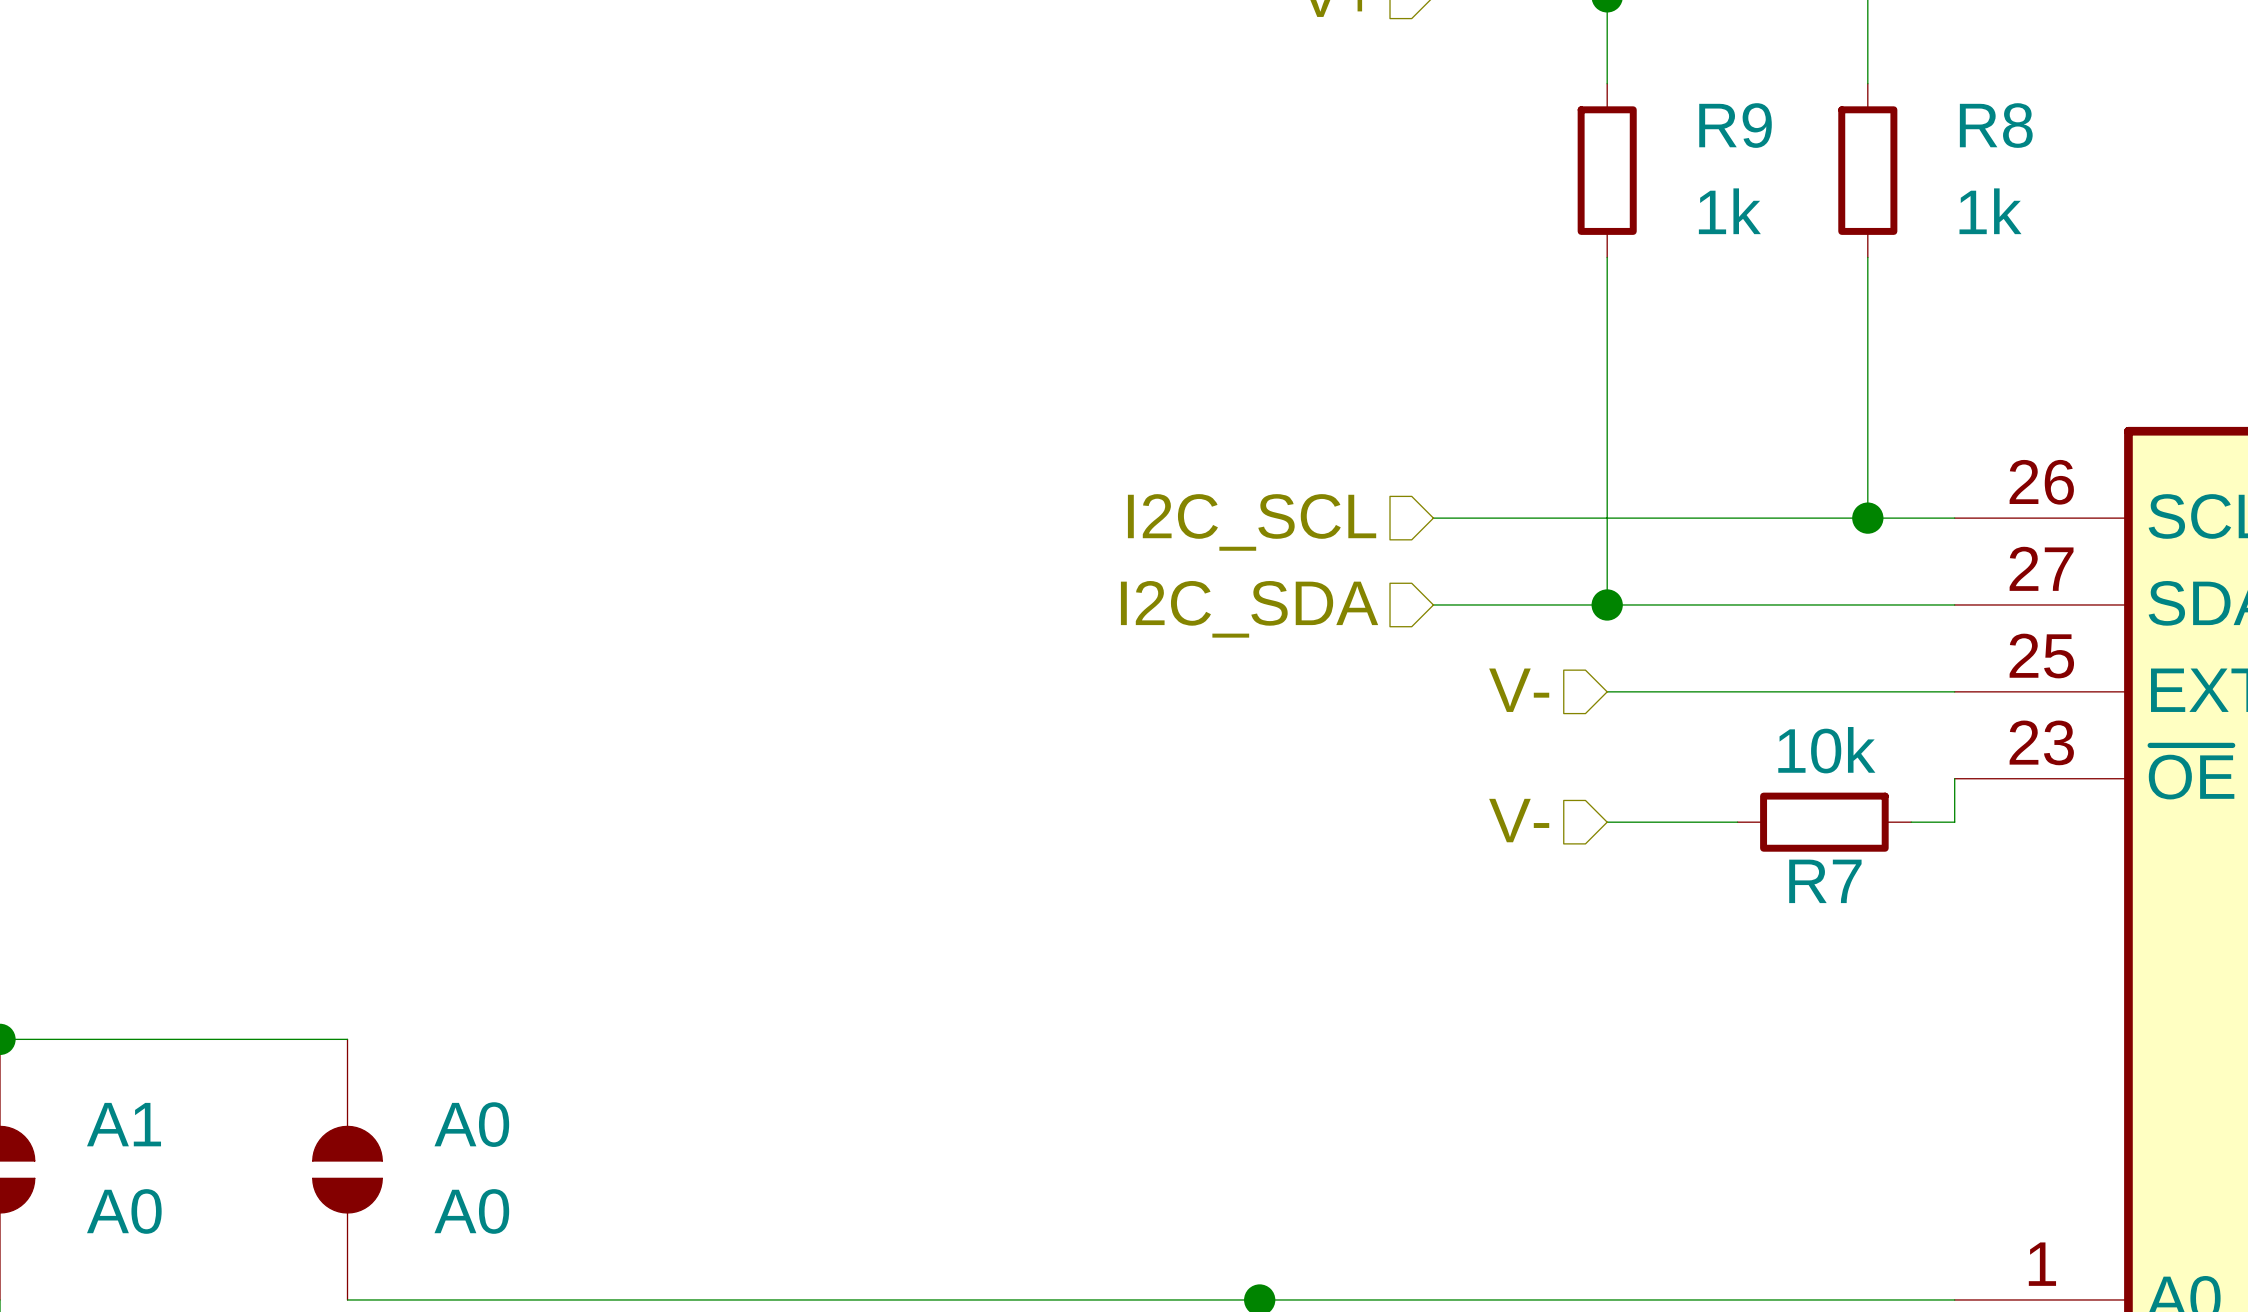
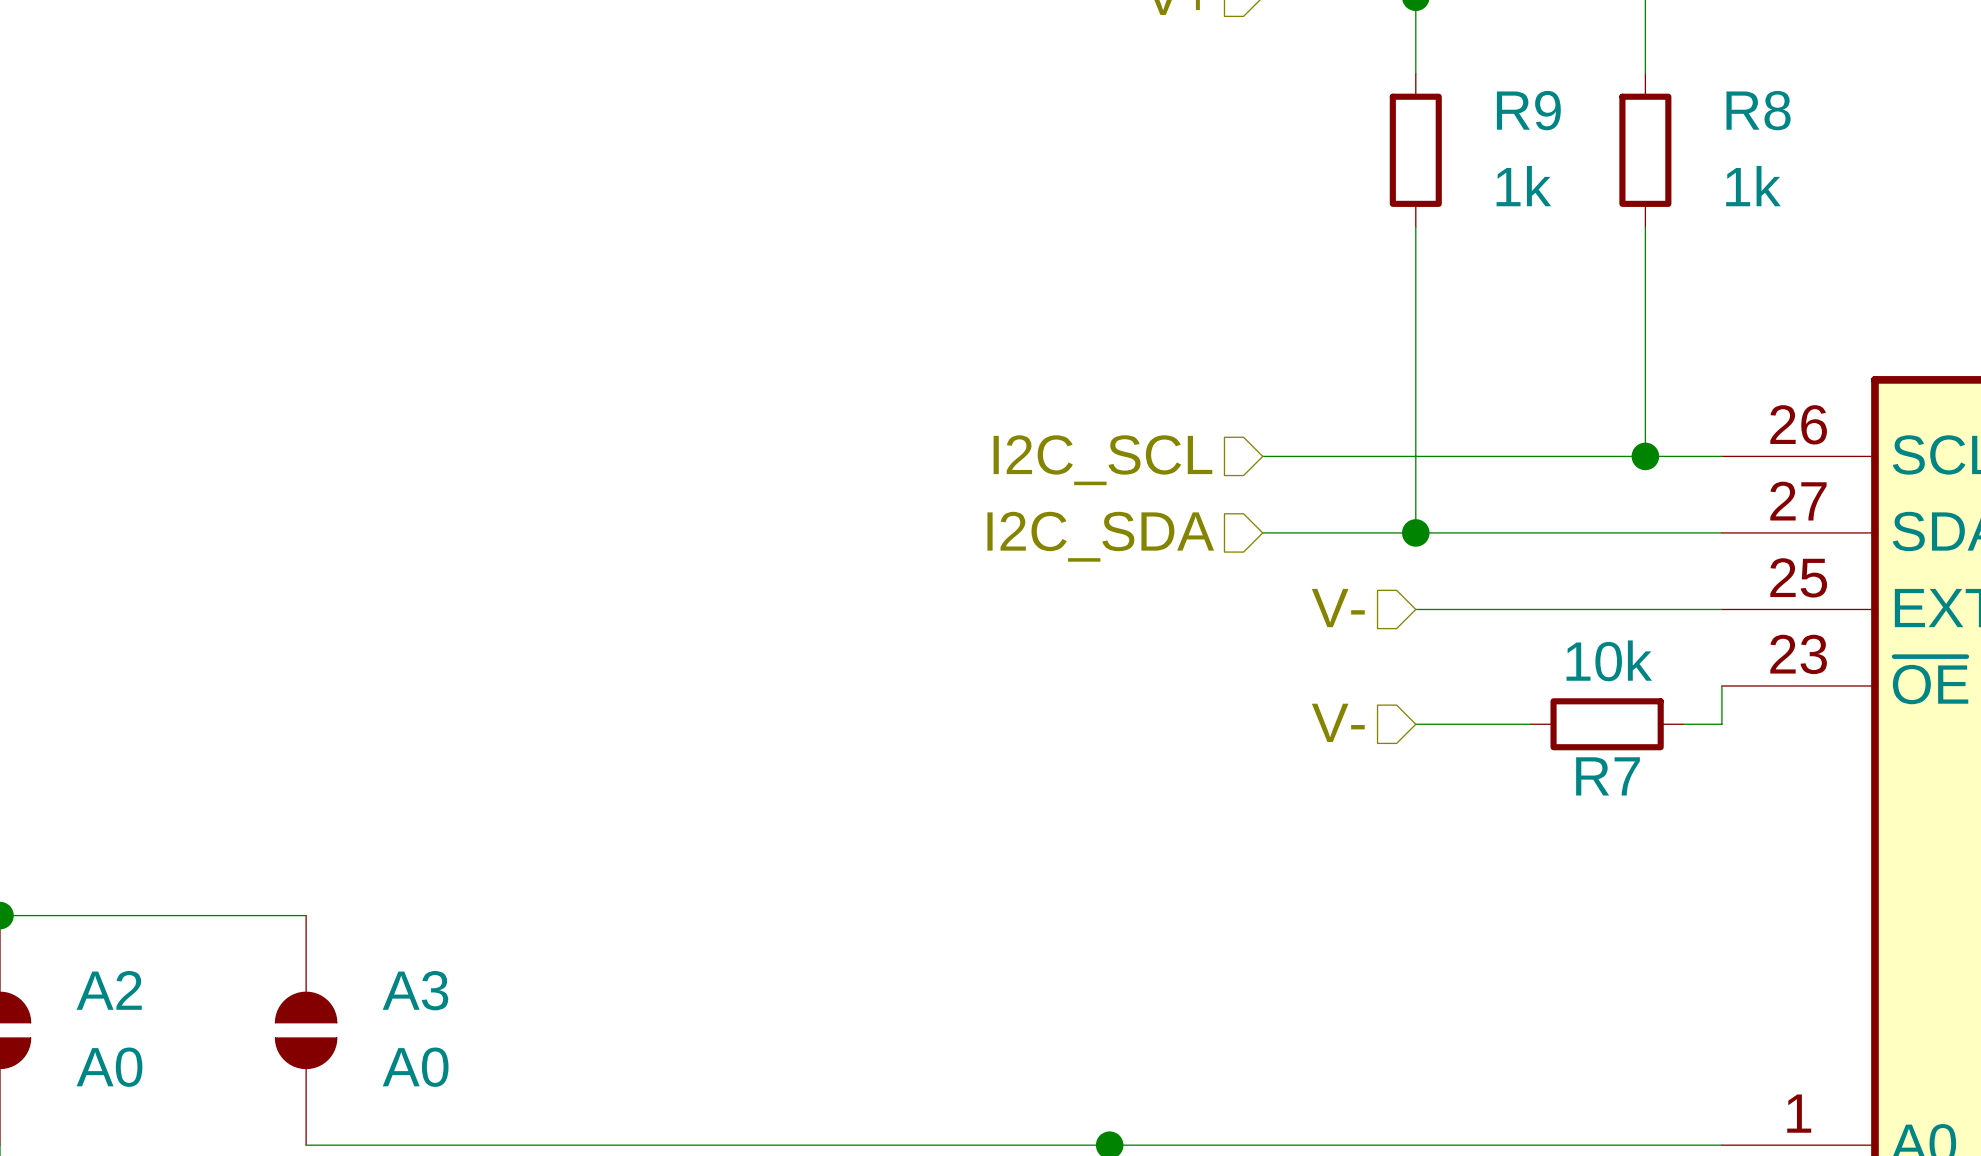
A1 name: A1 (124, 1124) -> A2 (109, 990)
A0 name: A0 (471, 1124) -> A3 (415, 990)

